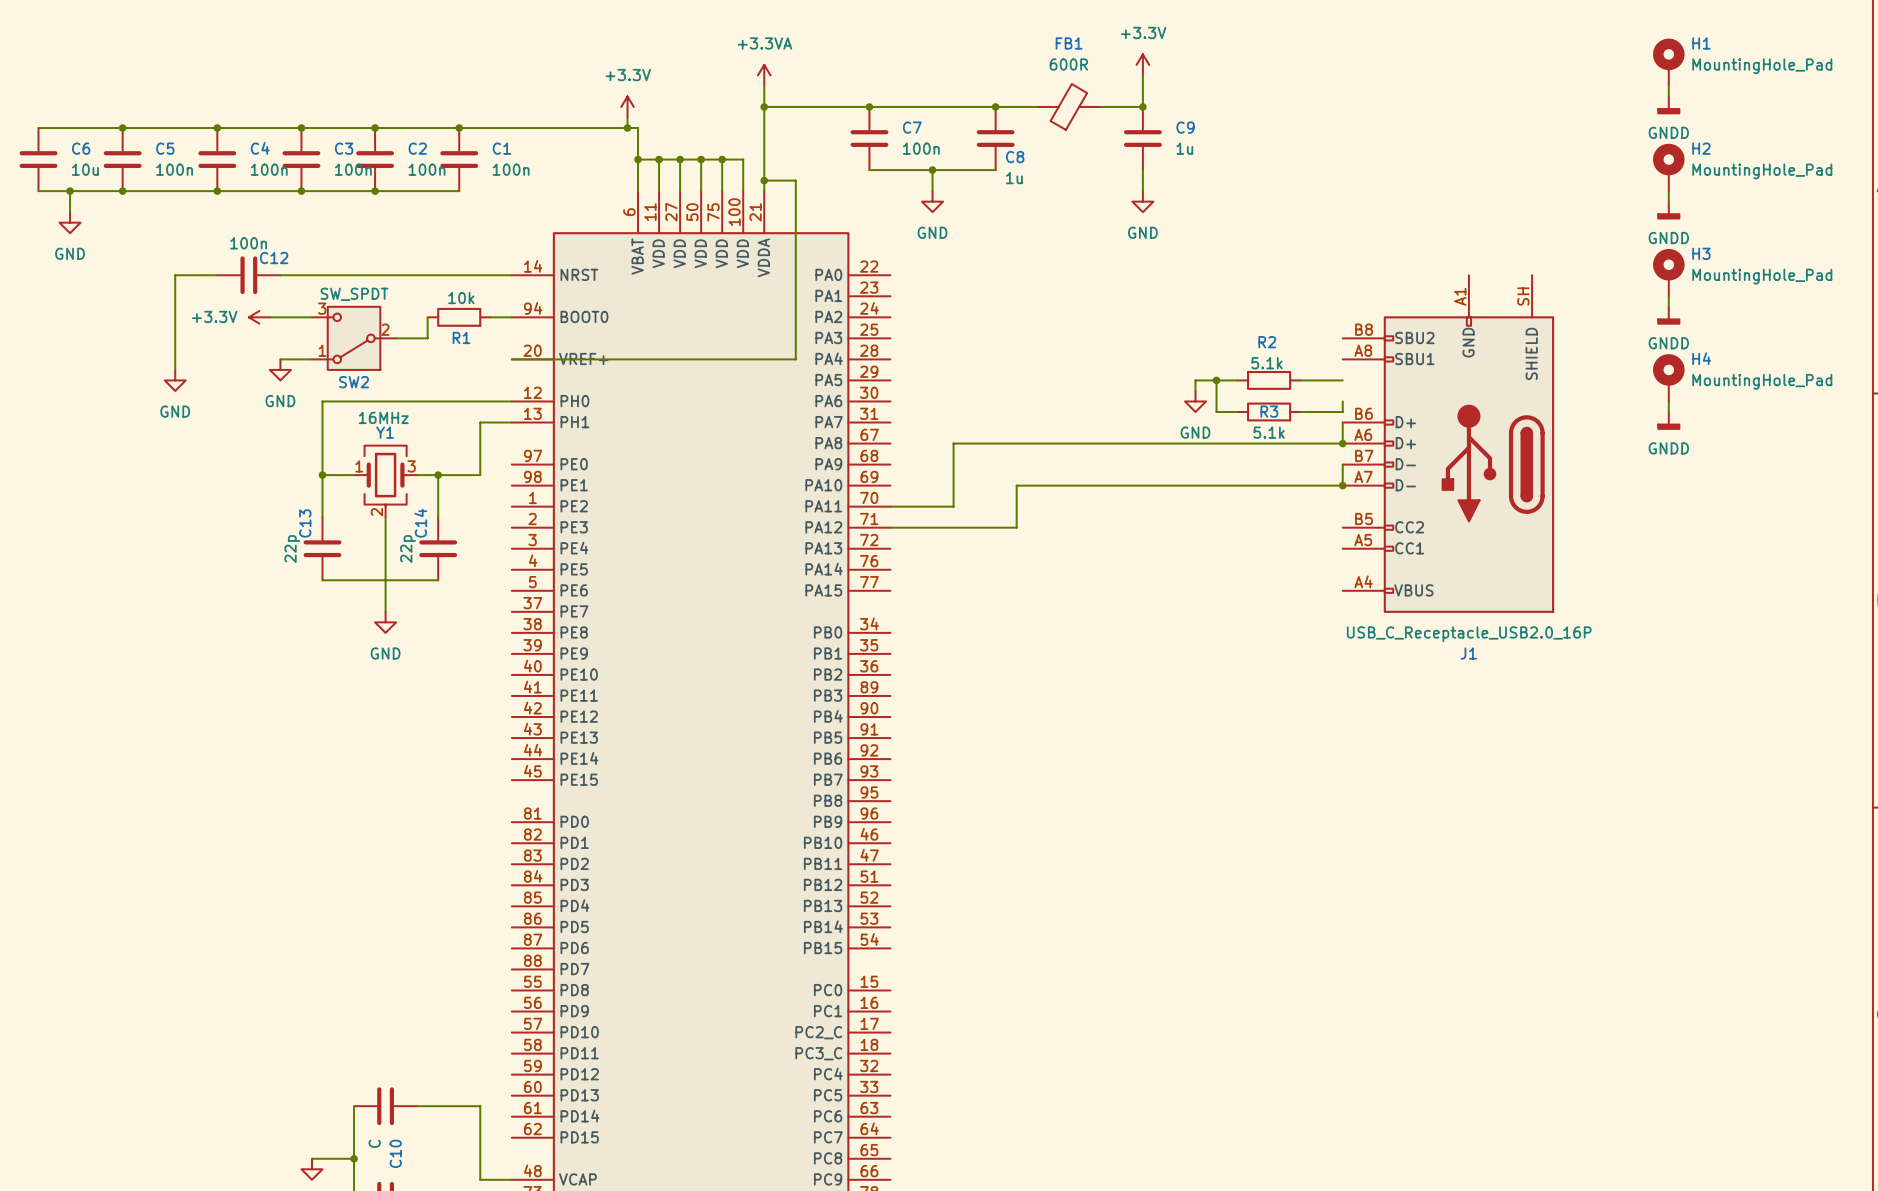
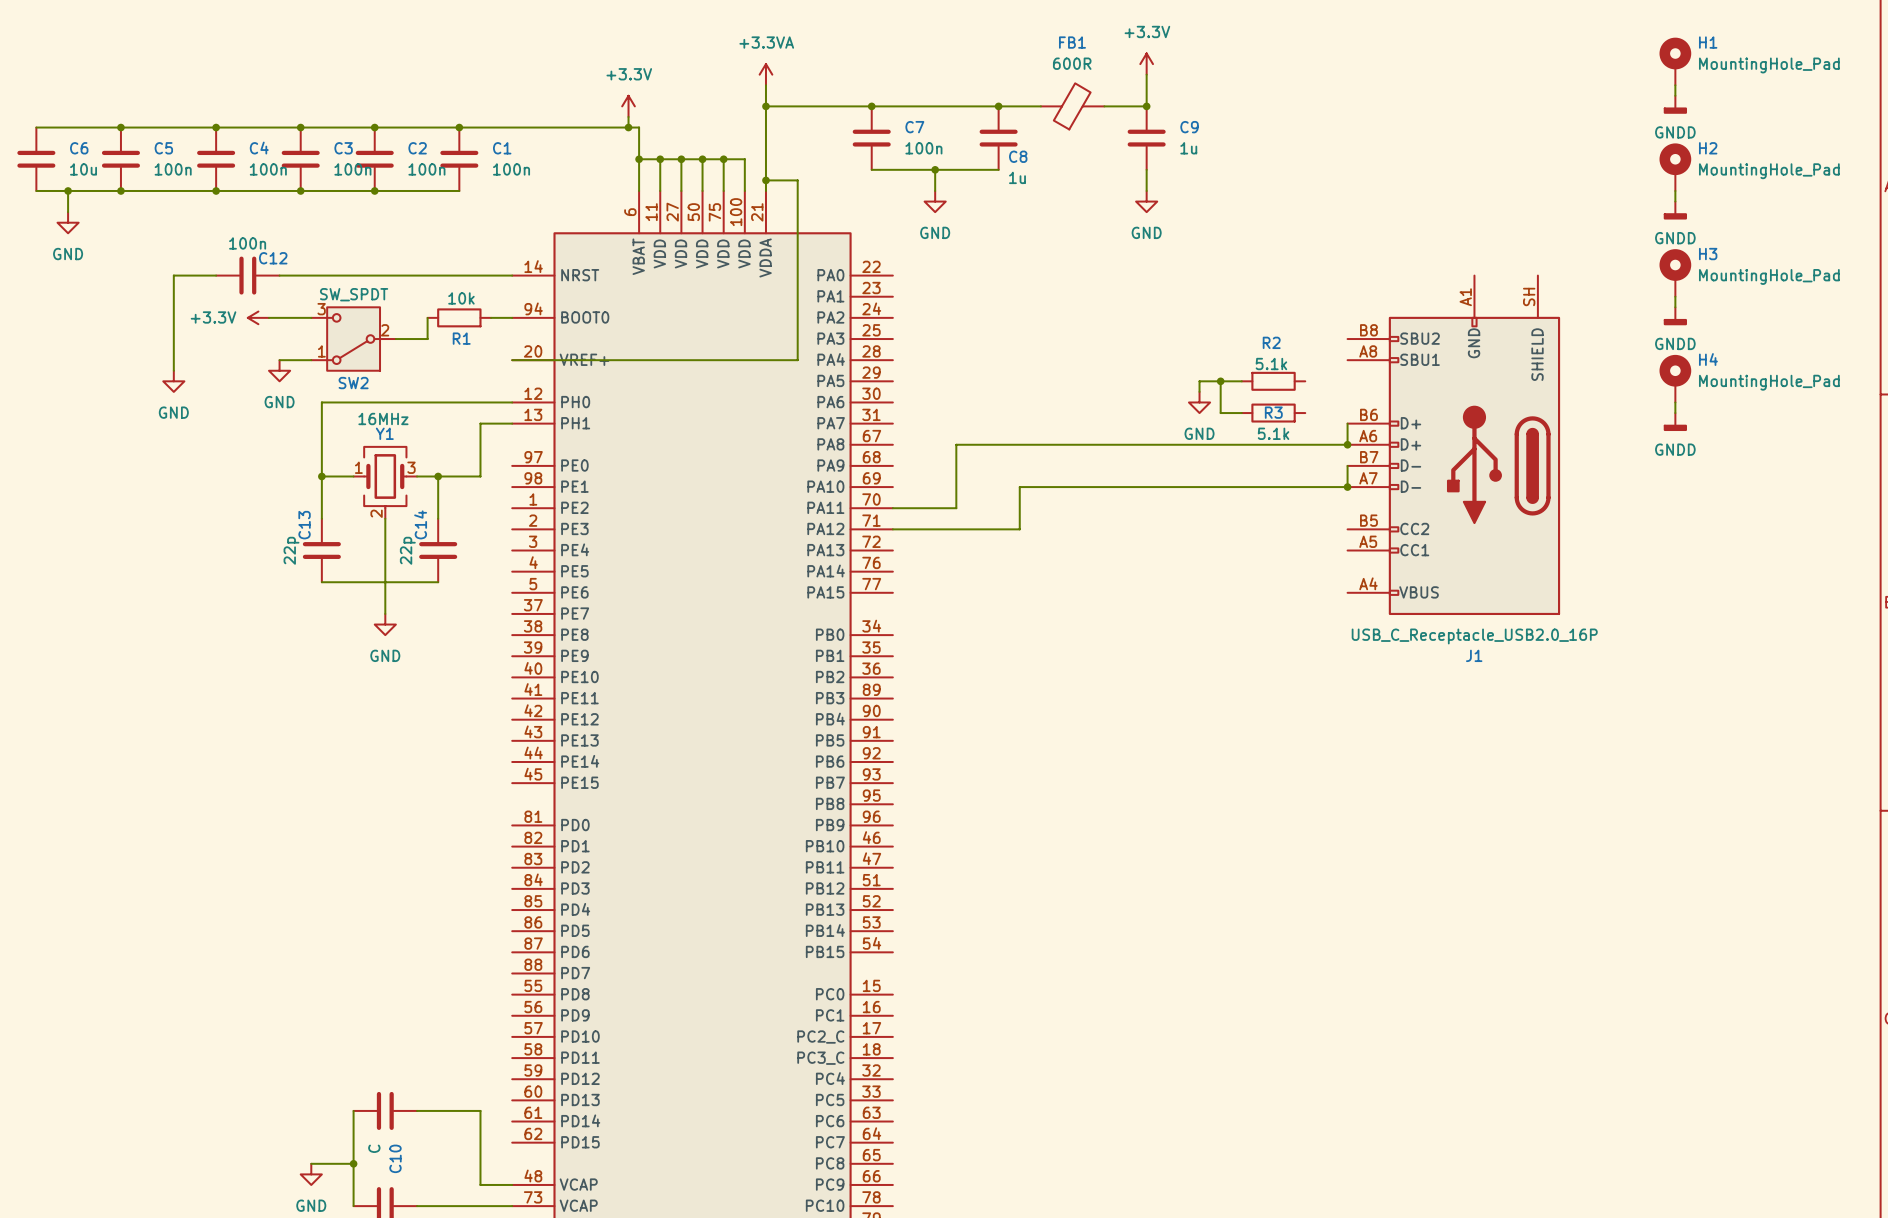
wire: (1300, 380) (1342, 380) -> none
wire: (1342, 401) (1342, 411) (1300, 411) -> none

